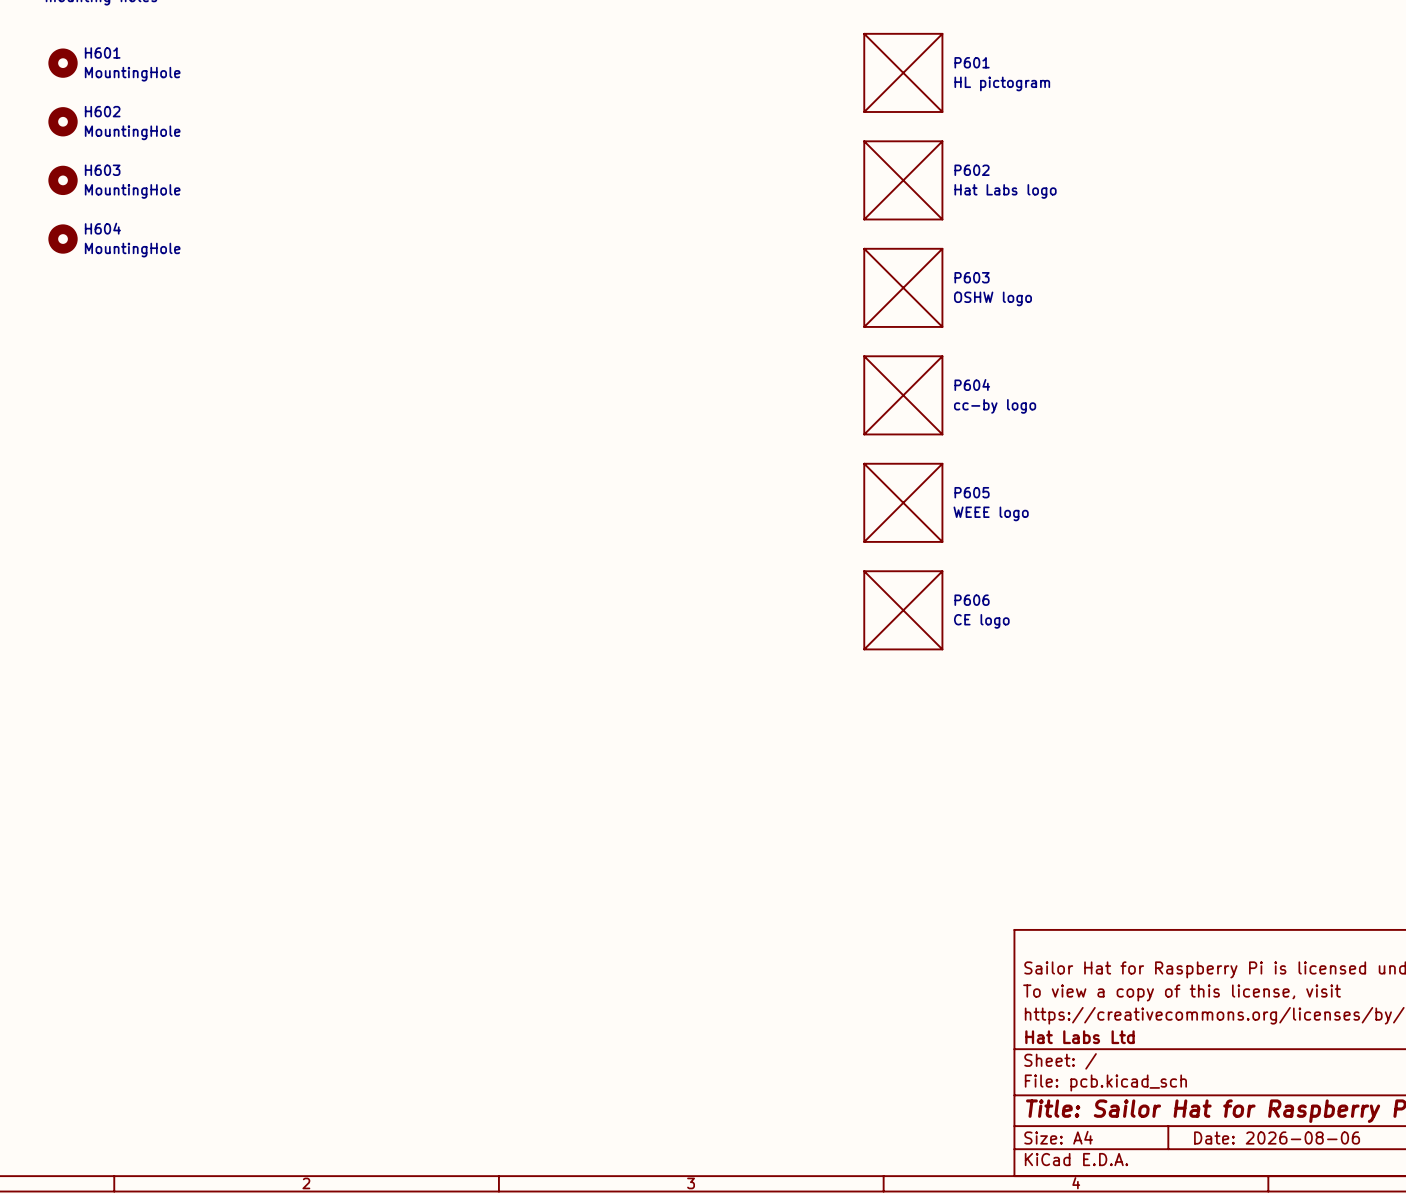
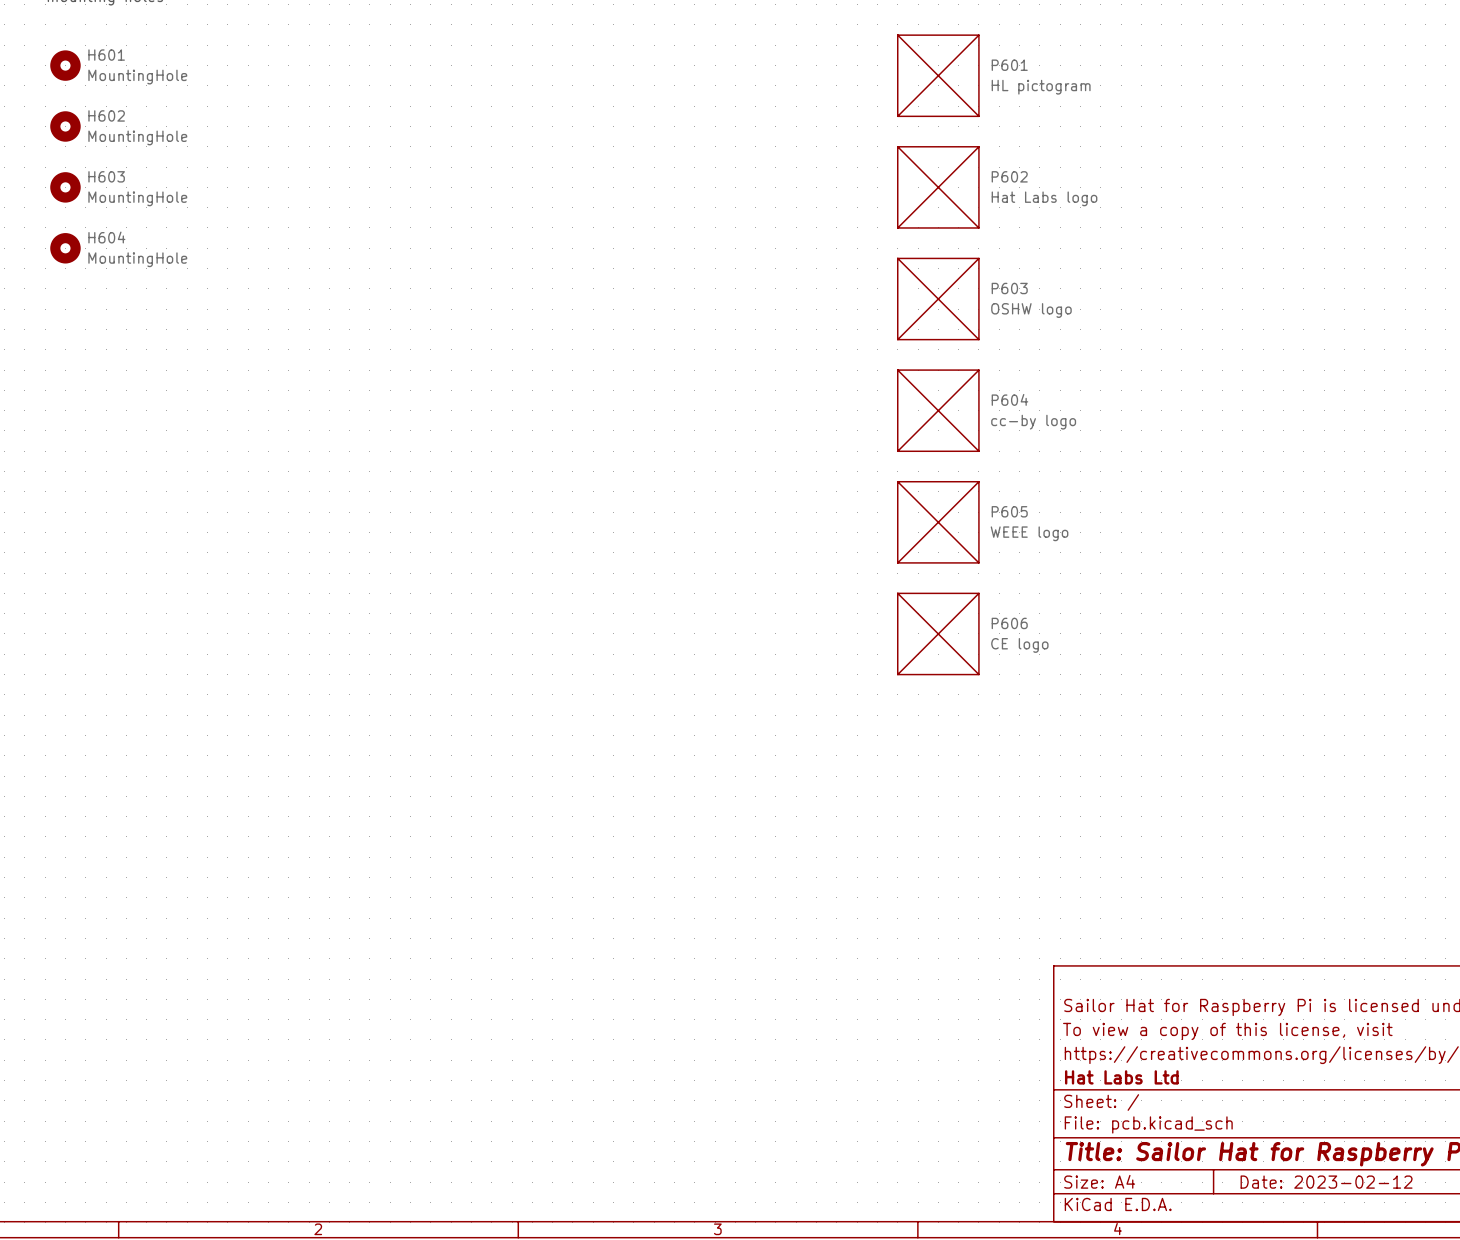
title block: Date: 2026-08-06 (1277, 1138) -> Date: 2023-02-12 (1326, 1182)

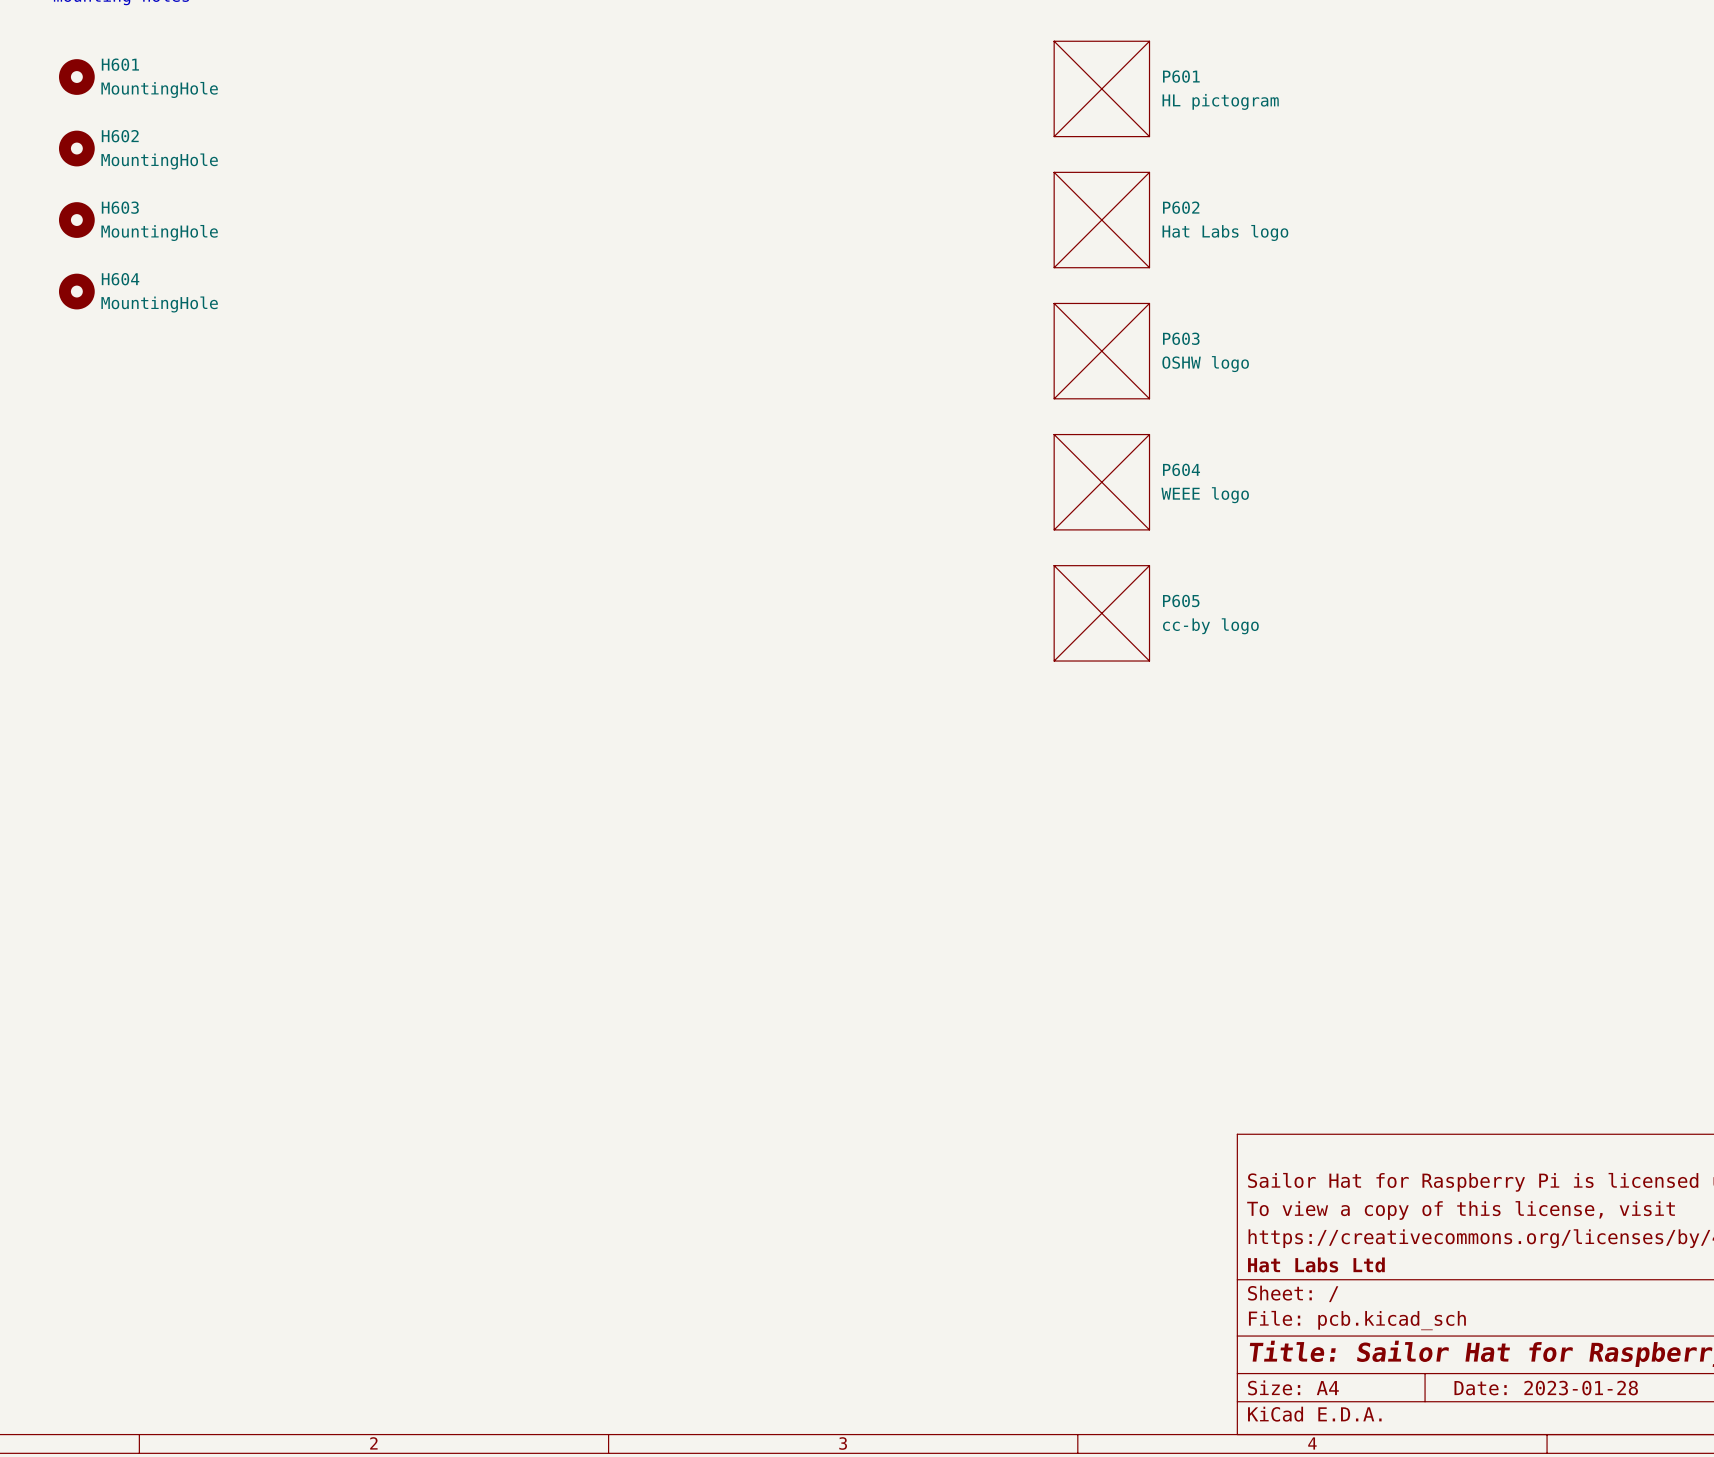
P604 value: cc-by logo (1033, 422) -> WEEE logo (1205, 495)
P605 value: WEEE logo (1029, 533) -> cc-by logo (1210, 626)
P606: CE logo (938, 633) -> none
title block: Date: 2023-02-12 (1326, 1182) -> Date: 2023-01-28 (1546, 1388)

